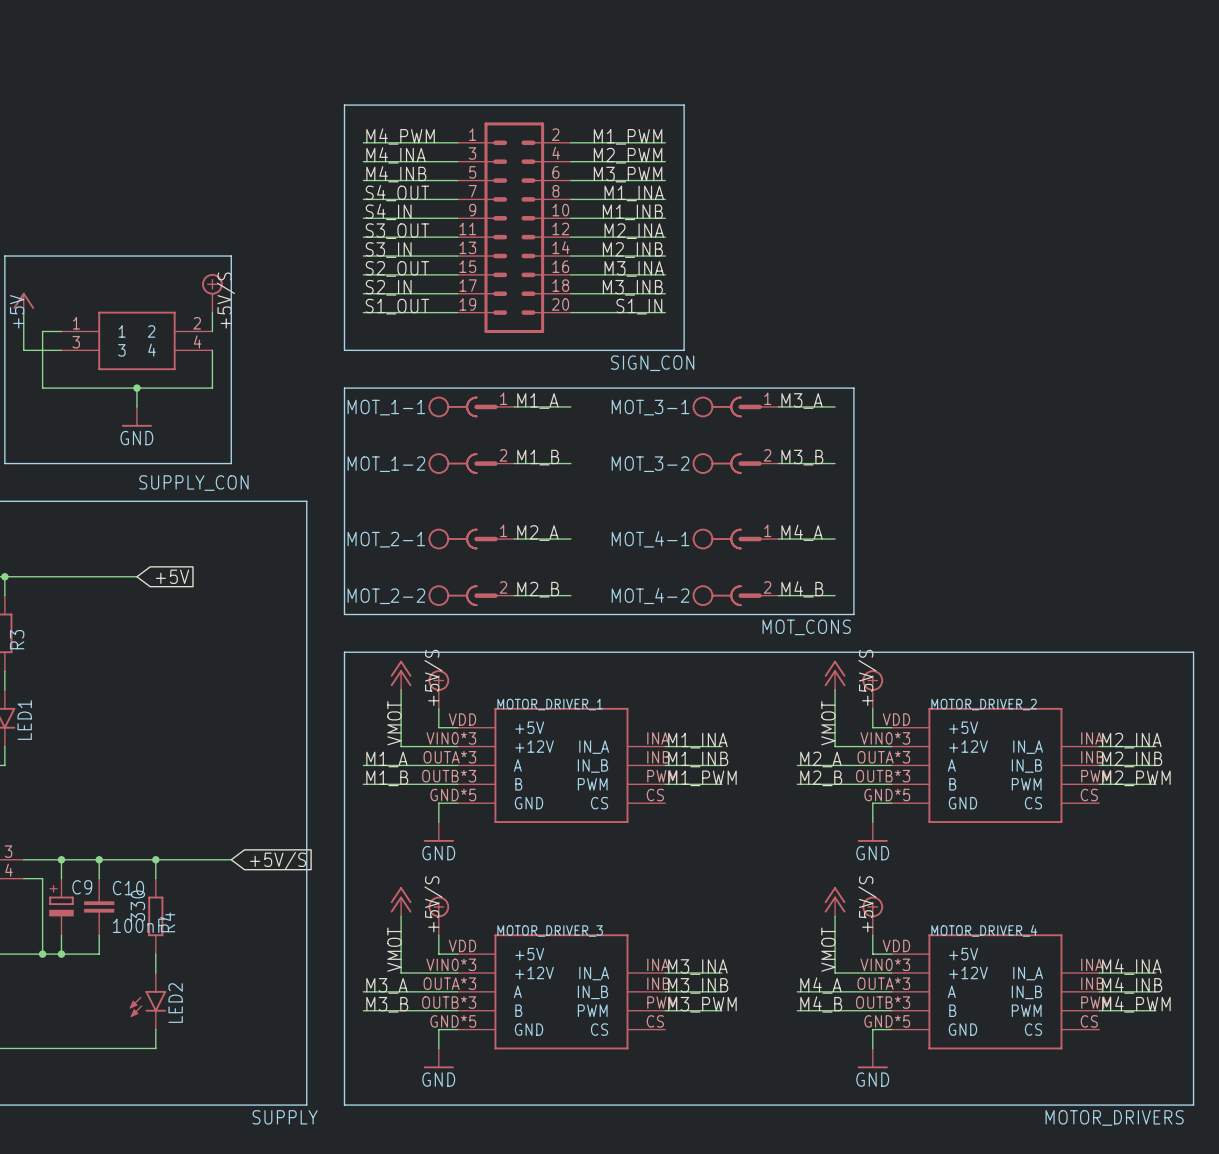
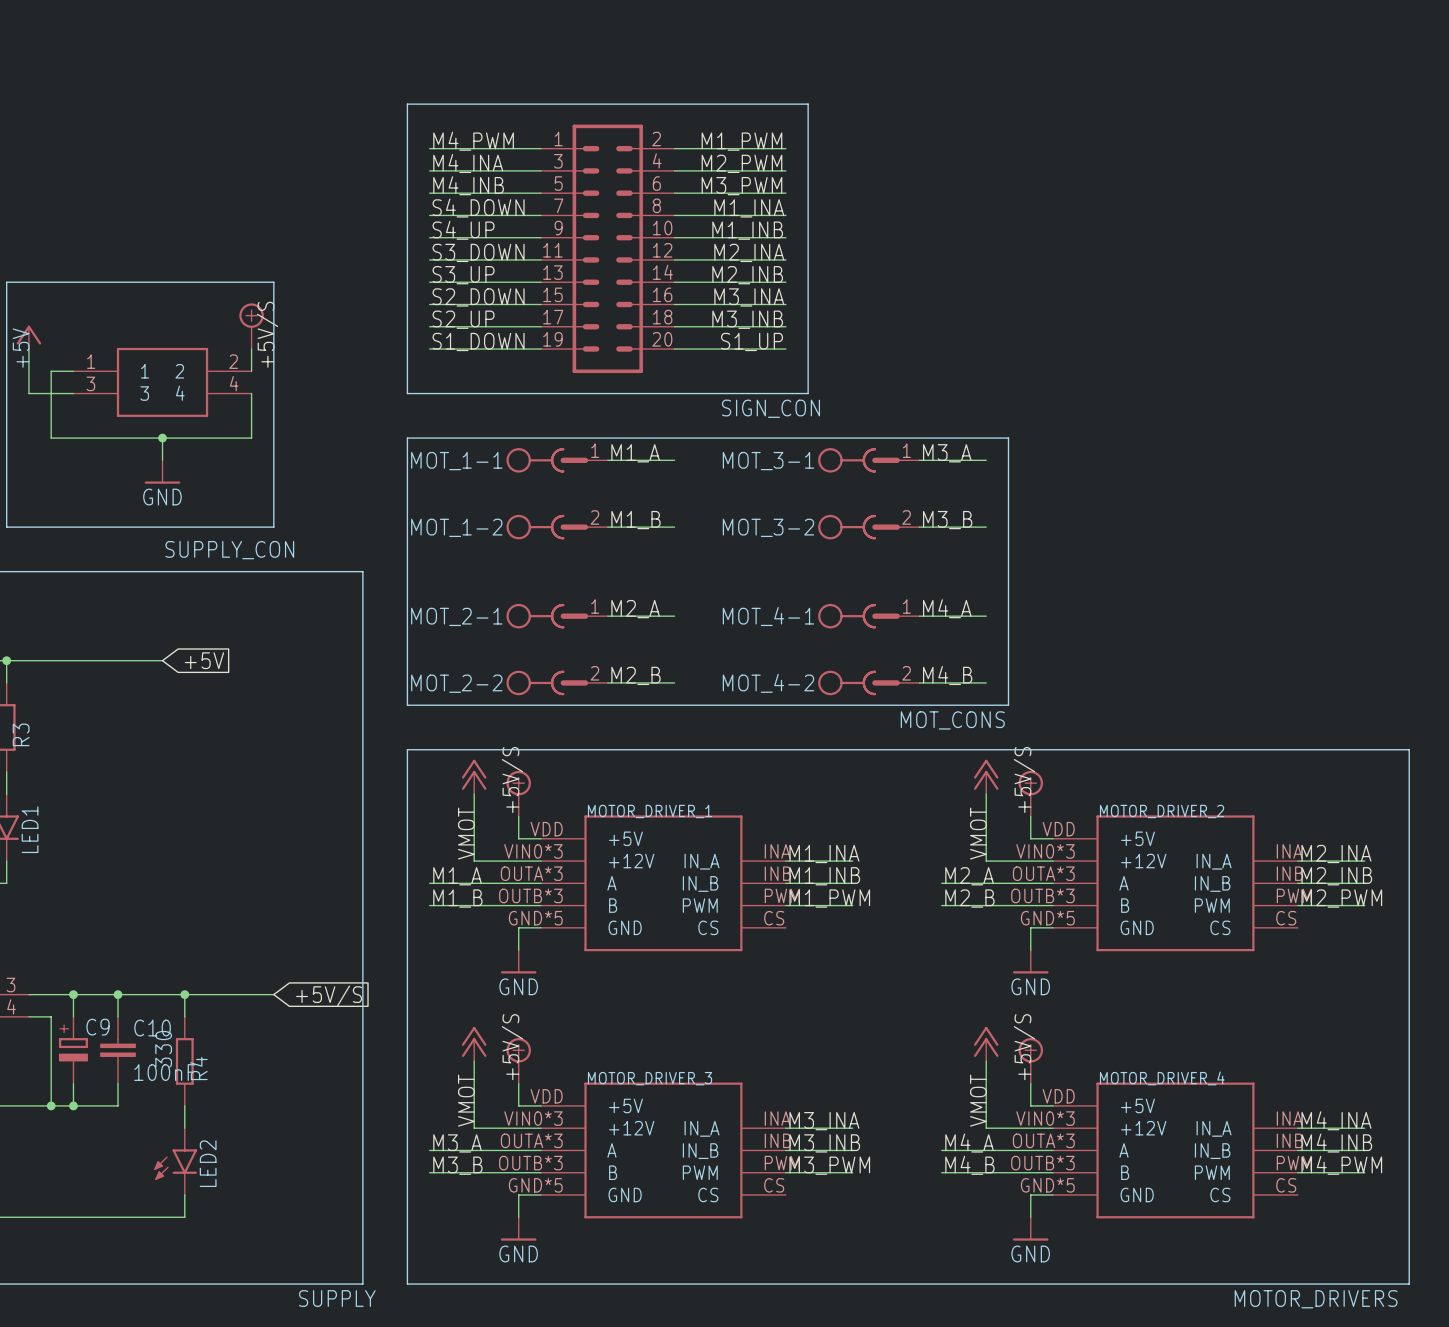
label: S4_OUT (397, 193) -> S4_DOWN (478, 208)
label: S4_IN (388, 211) -> S4_UP (463, 230)
label: S3_OUT (397, 231) -> S3_DOWN (478, 252)
label: S3_IN (388, 250) -> S3_UP (463, 275)
label: S2_OUT (397, 268) -> S2_DOWN (478, 297)
label: S2_IN (388, 287) -> S2_UP (463, 319)
label: S1_OUT (397, 306) -> S1_DOWN (478, 341)
label: S1_IN (639, 306) -> S1_UP (751, 341)

